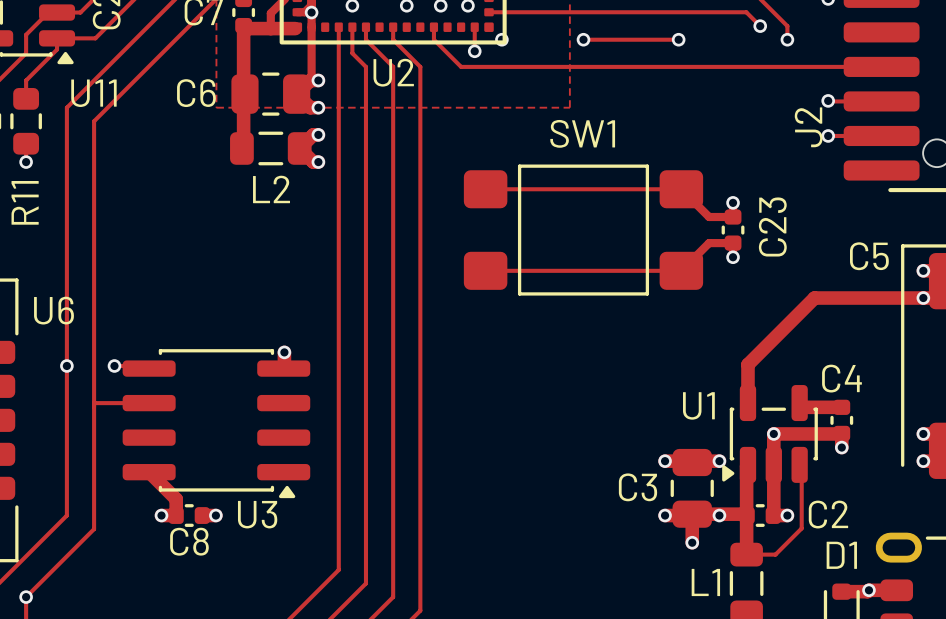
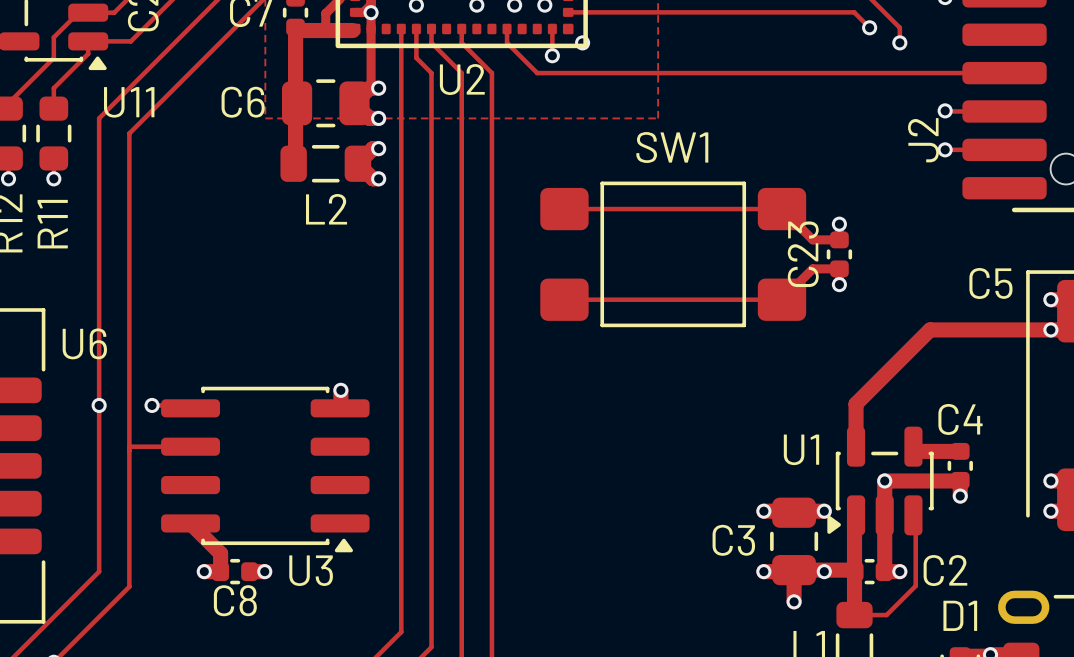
track: (583, 39) (678, 39) -> none
via: (583, 39) -> none
via: (678, 39) -> none
C23 name position: C23 (772, 226) -> C23 (803, 254)

